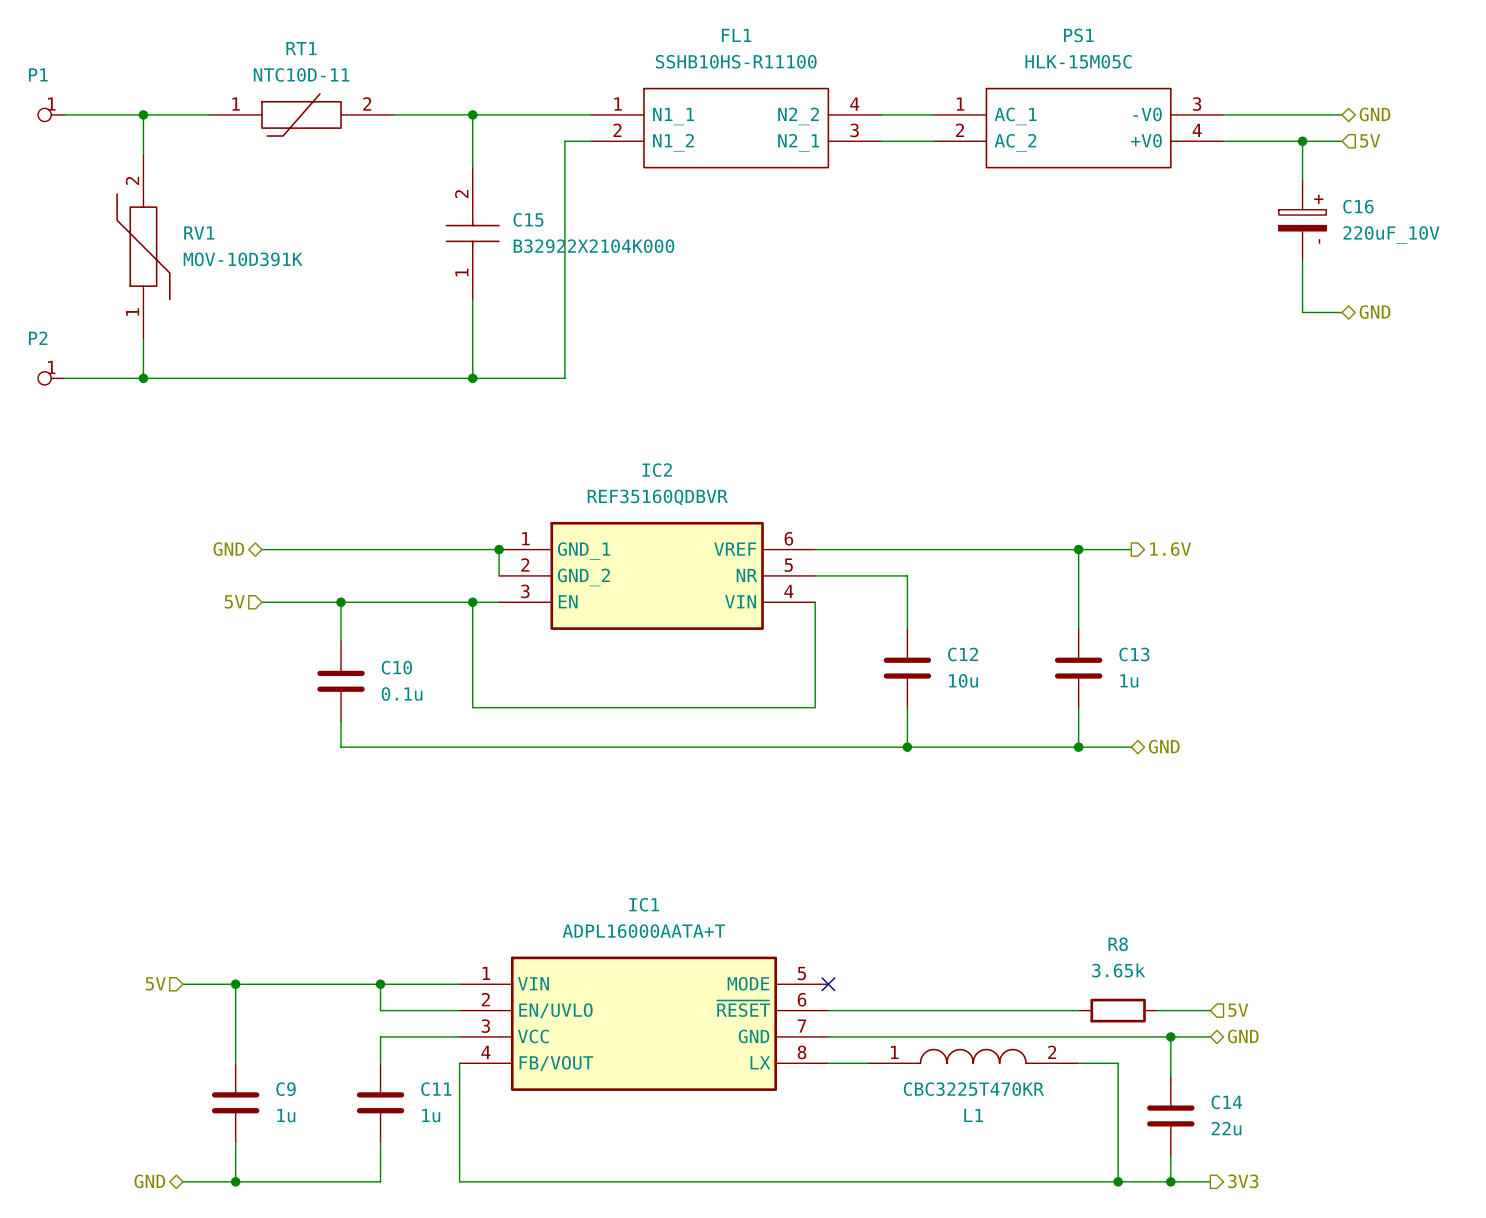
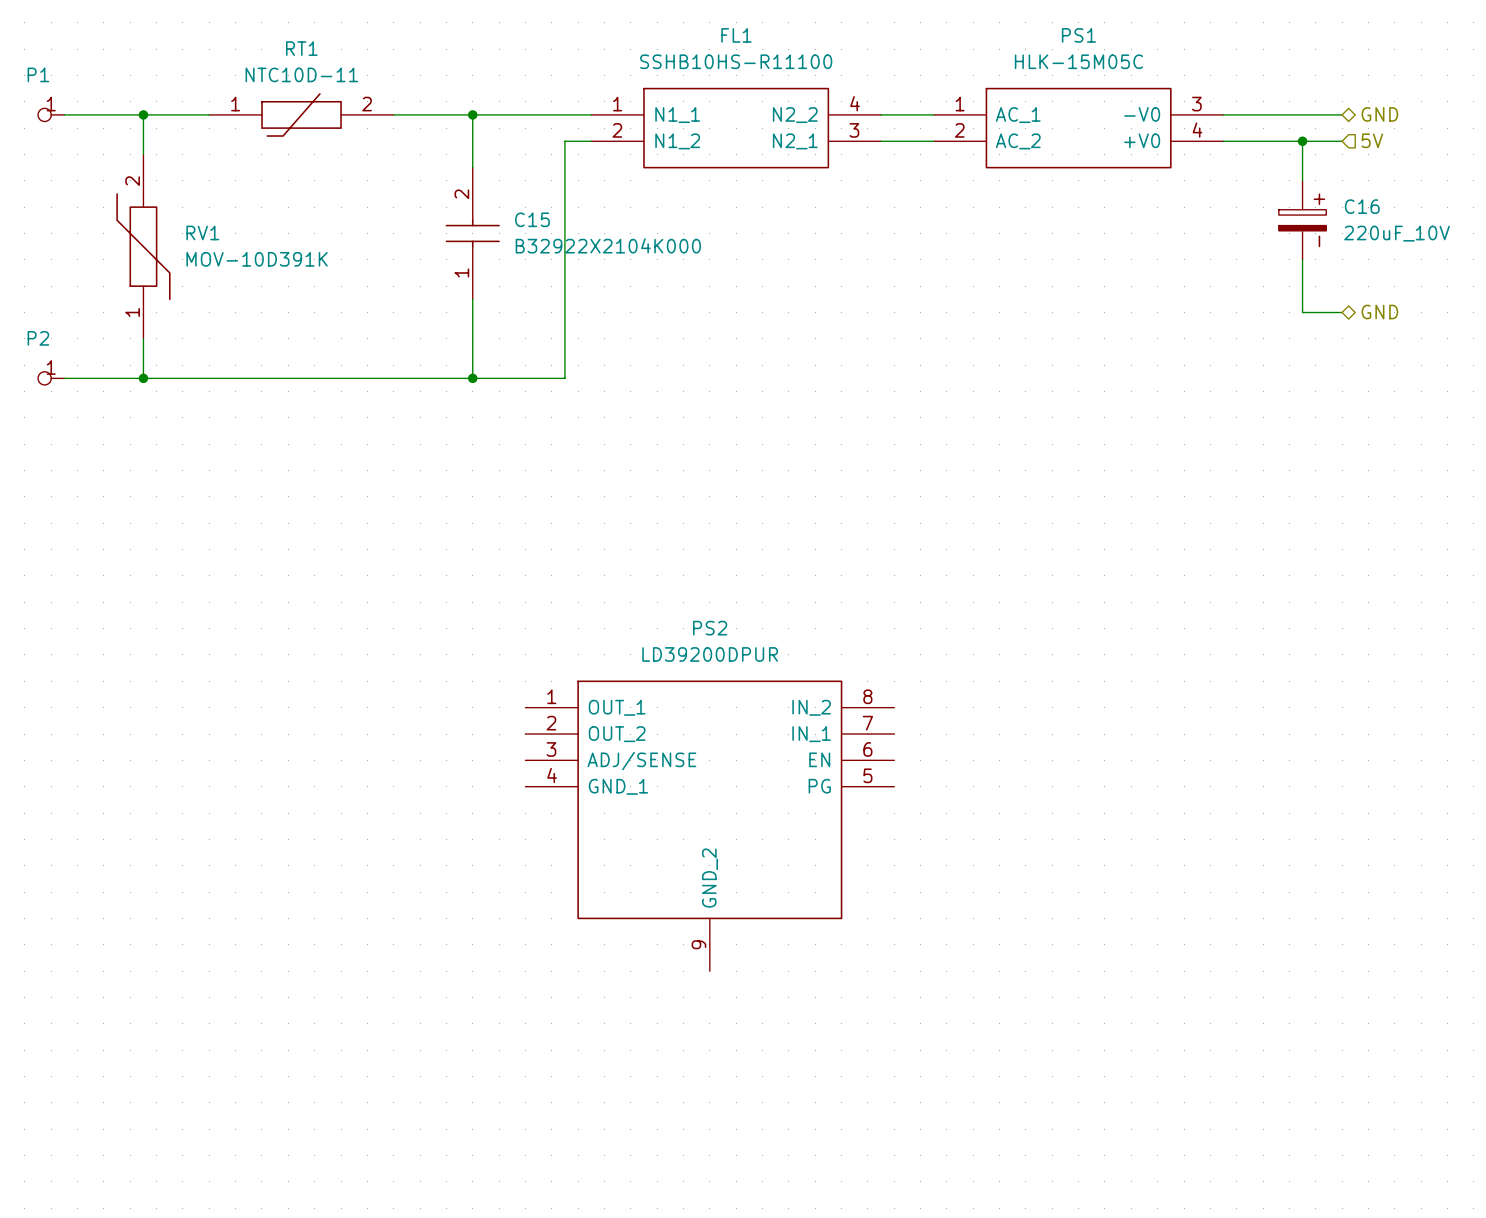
hierarchical label: GND (228, 549) -> none
wire: (261, 549) (499, 549) (499, 575) -> none
junction: (499, 549) -> none
wire: (815, 549) (1131, 549) -> none
wire: (1078, 549) (1078, 628) -> none
junction: (1078, 549) -> none
hierarchical label: 1.6V (1170, 549) -> none
IC2: REF35160QDBVR (657, 575) -> none
wire: (815, 575) (907, 575) (907, 628) -> none
hierarchical label: 5V (234, 601) -> none
wire: (261, 602) (499, 602) -> none
wire: (341, 602) (341, 641) -> none
junction: (341, 602) -> none
wire: (472, 602) (472, 707) (815, 707) (815, 602) -> none
junction: (472, 602) -> none
C12: 10u (907, 668) -> none
C13: 1u (1078, 668) -> none
C10: 0.1u (341, 681) -> none
wire: (907, 707) (907, 747) -> none
wire: (1078, 707) (1078, 747) -> none
wire: (341, 720) (341, 747) (1131, 747) -> none
hierarchical label: GND (1164, 746) -> none
junction: (907, 747) -> none
junction: (1078, 747) -> none
PS2: none -> LD39200DPUR (709, 825)
hierarchical label: 5V (155, 983) -> none
wire: (182, 984) (459, 984) -> none
wire: (235, 984) (235, 1063) -> none
junction: (235, 984) -> none
wire: (380, 984) (380, 1010) (459, 1010) -> none
junction: (380, 984) -> none
no-connect mark: (828, 984) -> none
wire: (828, 1010) (1078, 1010) -> none
R8: 3.65k (1118, 1010) -> none
wire: (1157, 1010) (1210, 1010) -> none
hierarchical label: 5V (1238, 1010) -> none
IC1: ADPL16000AATA+T (643, 1023) -> none
wire: (459, 1036) (380, 1036) (380, 1063) -> none
wire: (828, 1036) (1210, 1036) -> none
wire: (1170, 1036) (1170, 1076) -> none
junction: (1170, 1036) -> none
hierarchical label: GND (1243, 1036) -> none
L1: CBC3225T470KR (973, 1056) -> none
wire: (459, 1063) (459, 1181) (1210, 1181) -> none
wire: (828, 1063) (867, 1063) -> none
wire: (1078, 1063) (1118, 1063) (1118, 1181) -> none
C9: 1u (235, 1102) -> none
C11: 1u (380, 1102) -> none
C14: 22u (1170, 1115) -> none
wire: (235, 1142) (235, 1181) -> none
wire: (380, 1142) (380, 1181) (182, 1181) -> none
wire: (1170, 1155) (1170, 1181) -> none
hierarchical label: GND (149, 1181) -> none
junction: (235, 1181) -> none
junction: (1118, 1181) -> none
junction: (1170, 1181) -> none
hierarchical label: 3V3 (1243, 1181) -> none

